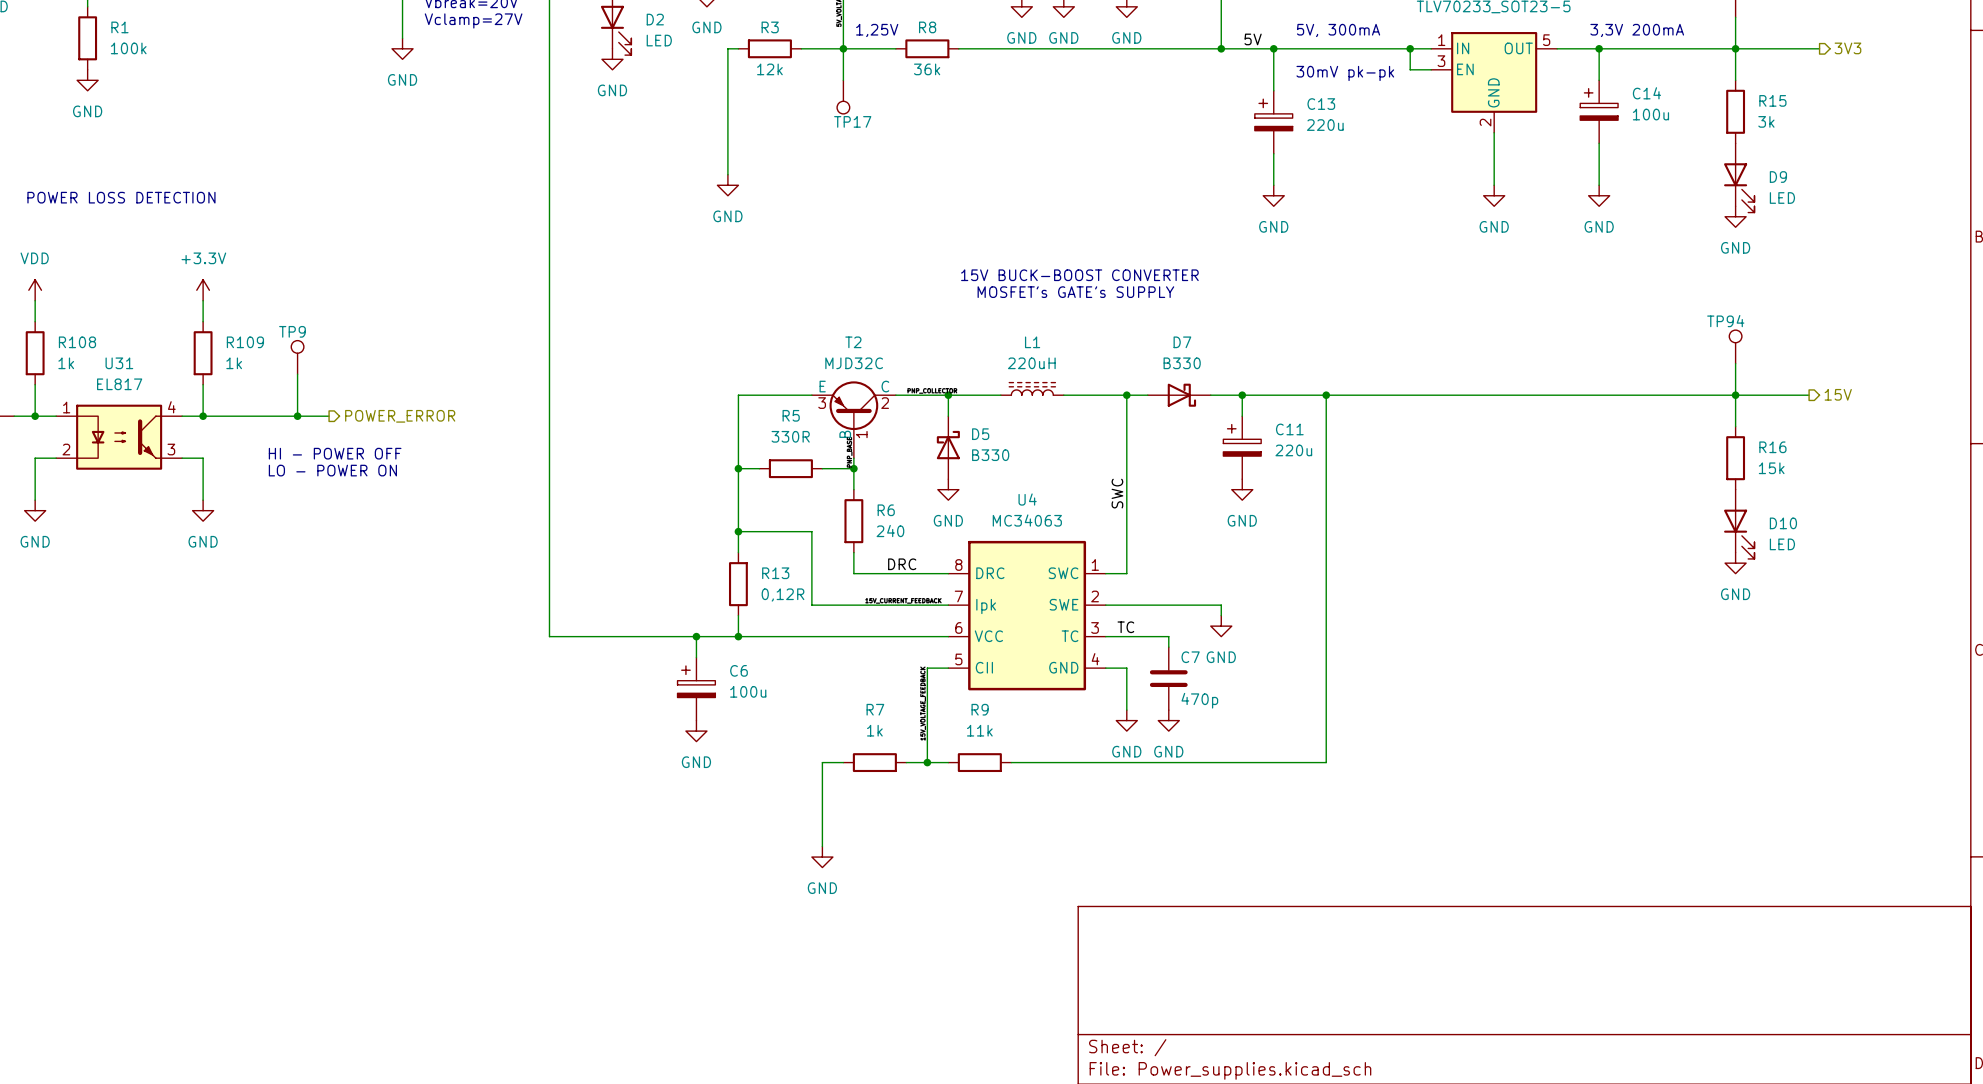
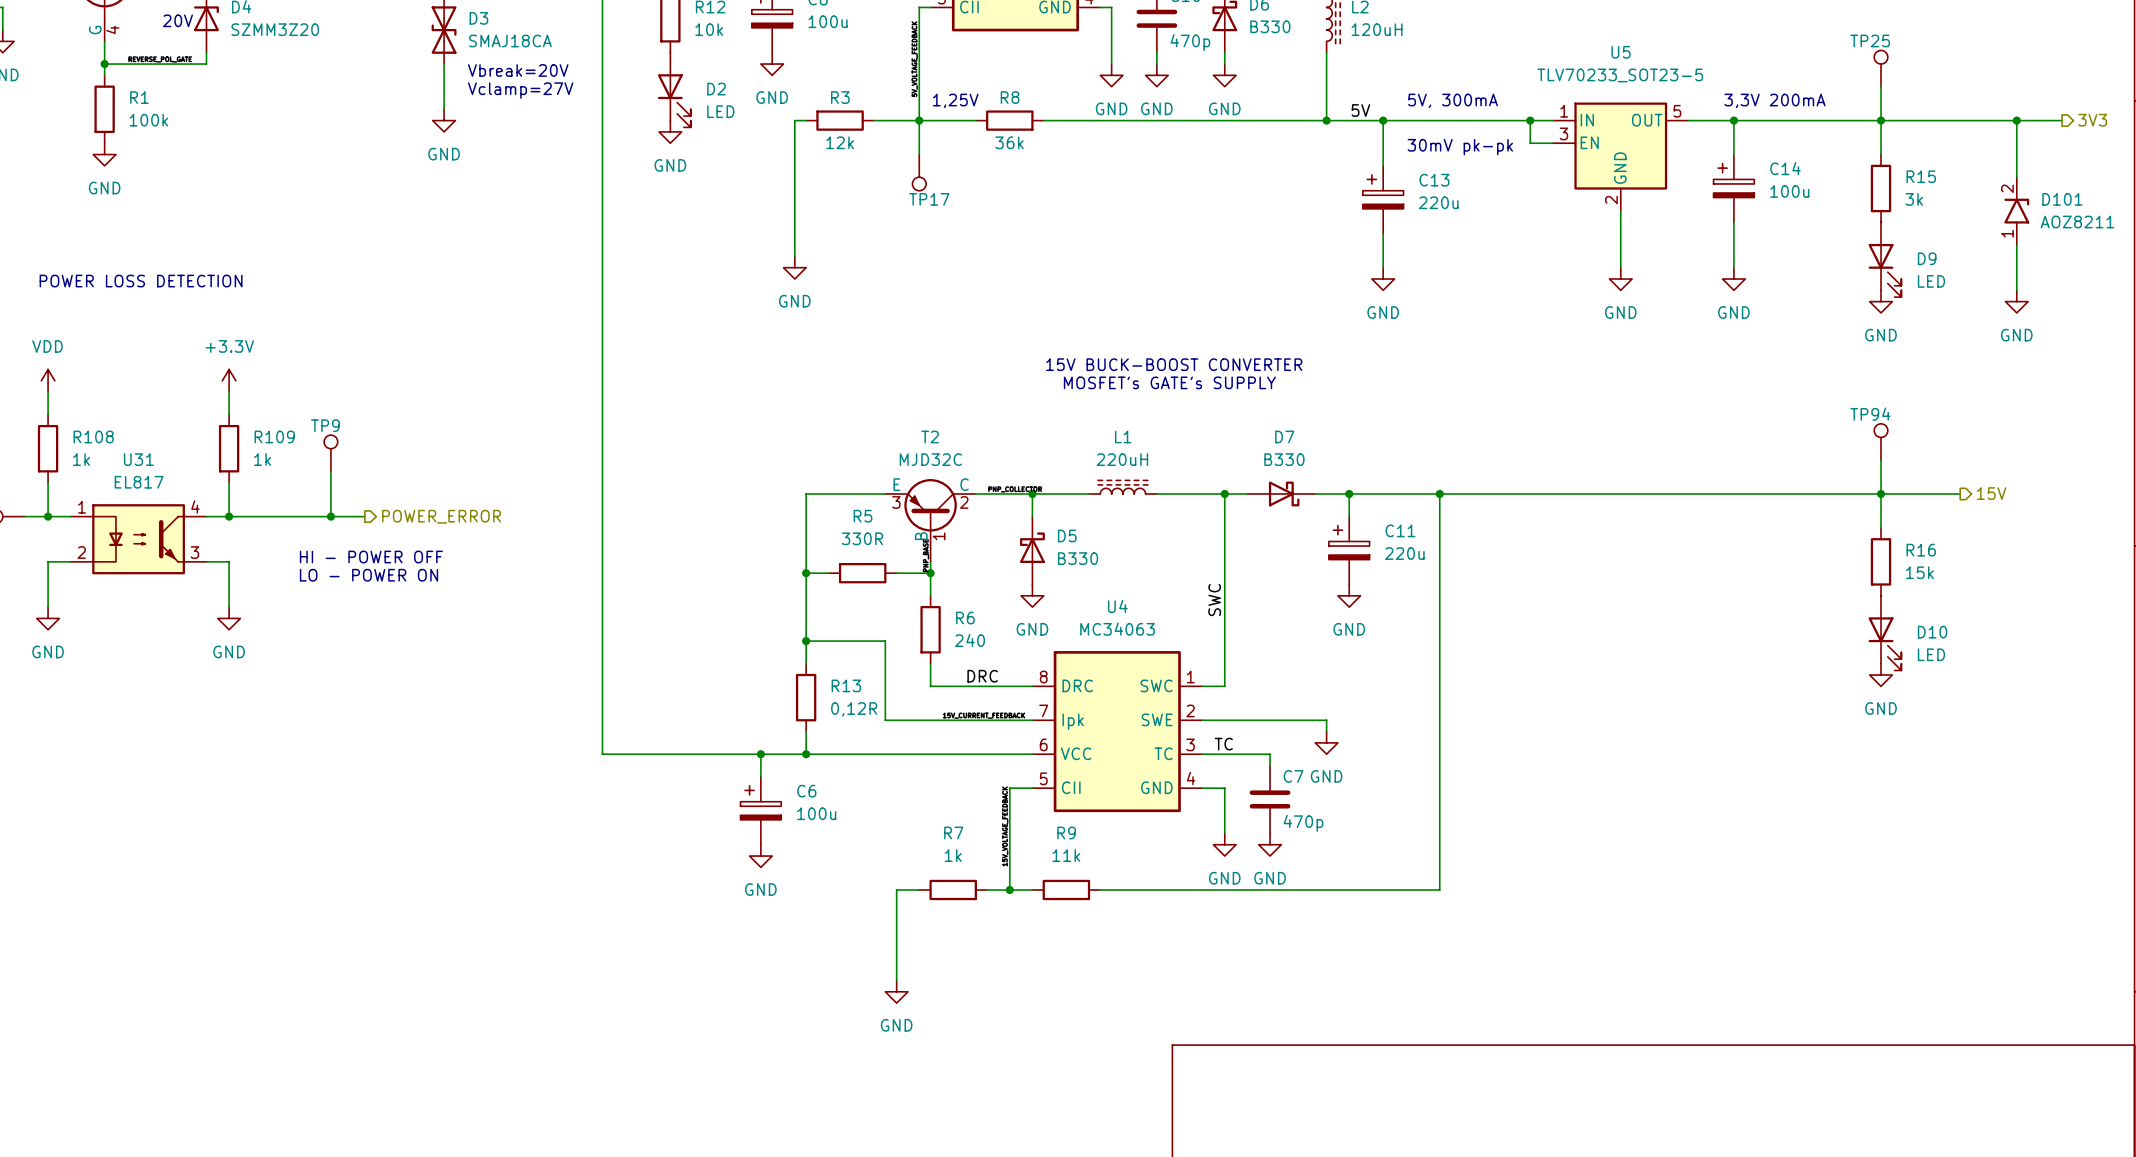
wire: none -> (1971, 120) (2062, 120)
hierarchical label position: 3V3 (1847, 48) -> 3V3 (2092, 120)
wire: none -> (2016, 120) (2016, 177)
junction: none -> (2016, 120)
D101: none -> AOZ8211 (2016, 211)
wire: none -> (2016, 245) (2016, 290)
power symbol: none -> GND (2016, 301)

